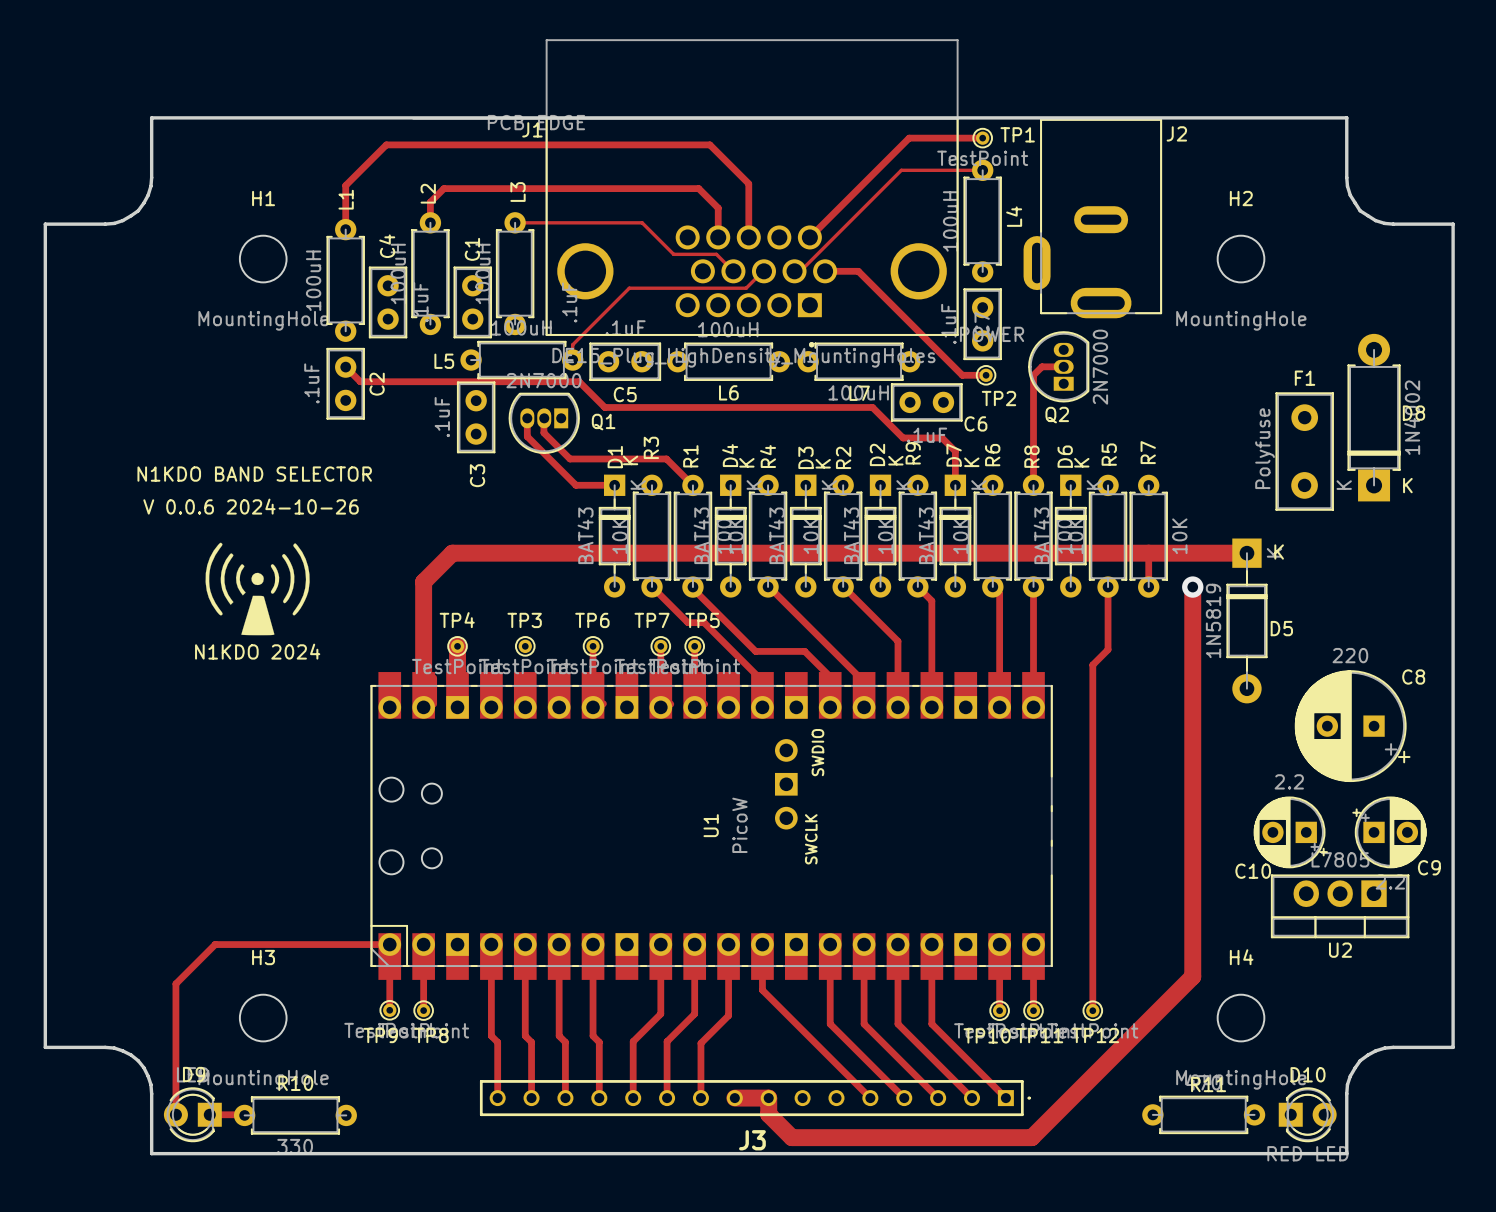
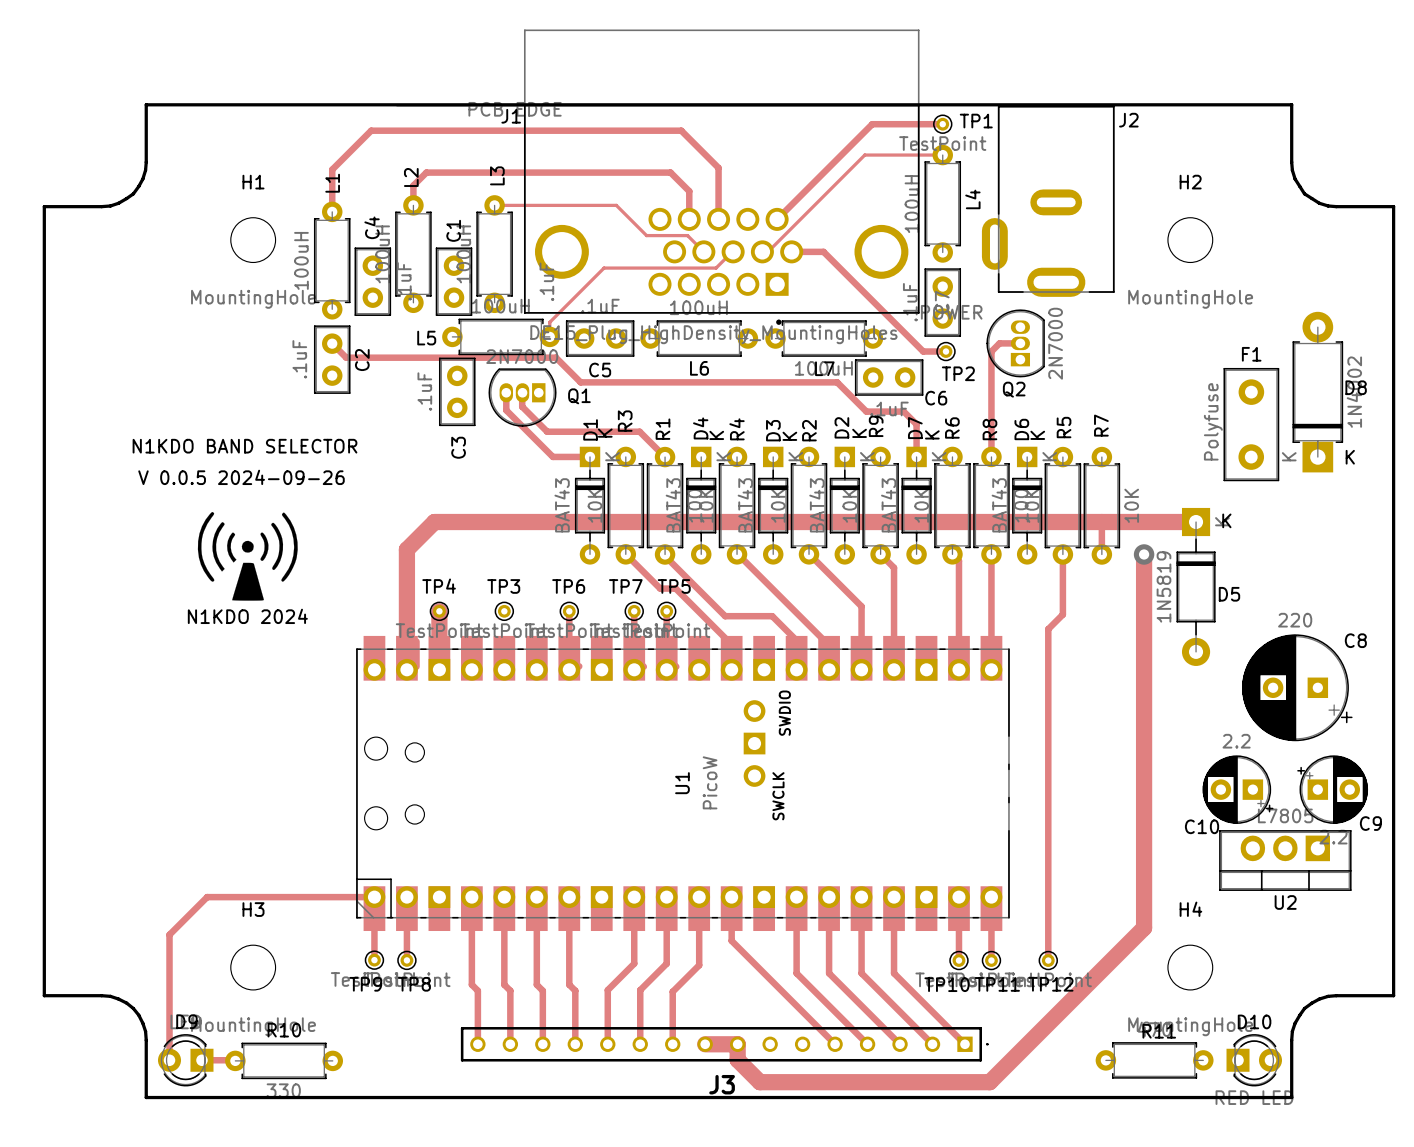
text: V 0.0.6 2024-10-26 (251, 506) -> V 0.0.5 2024-09-26 (241, 477)

